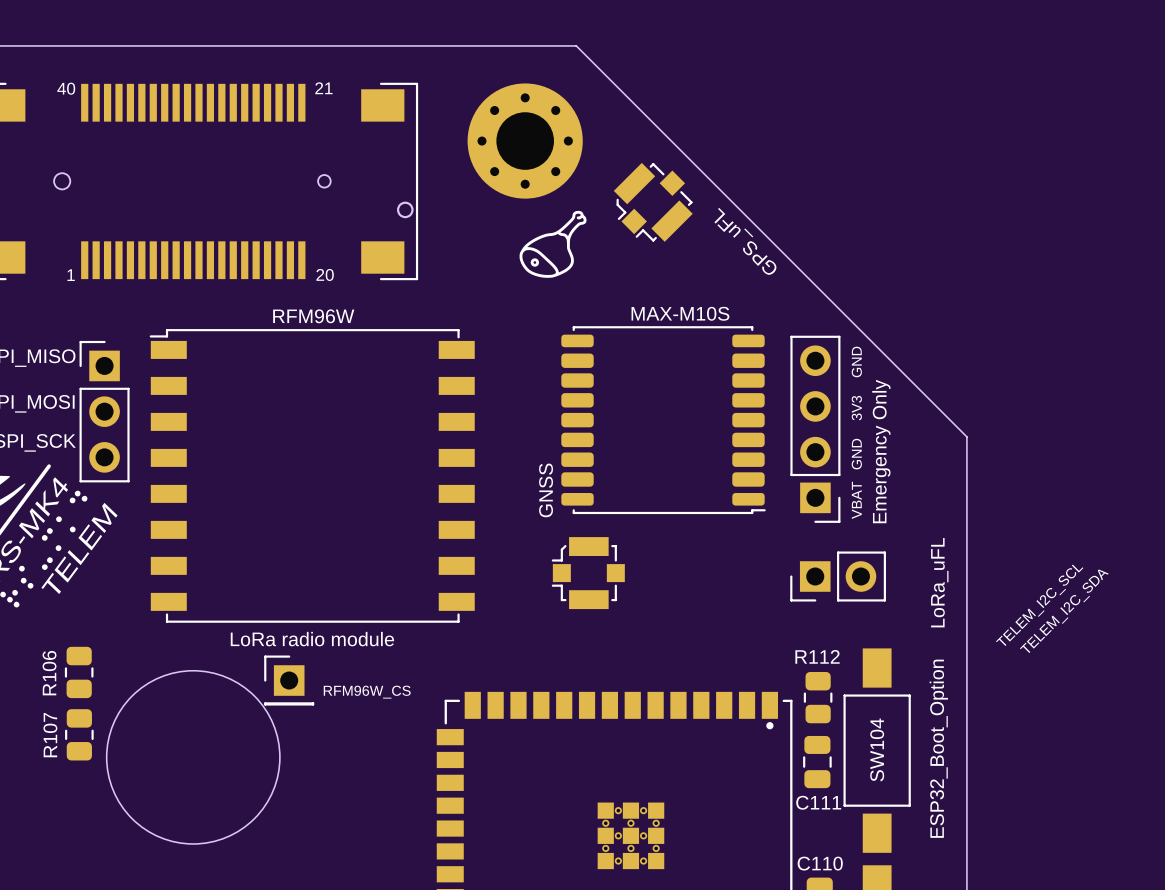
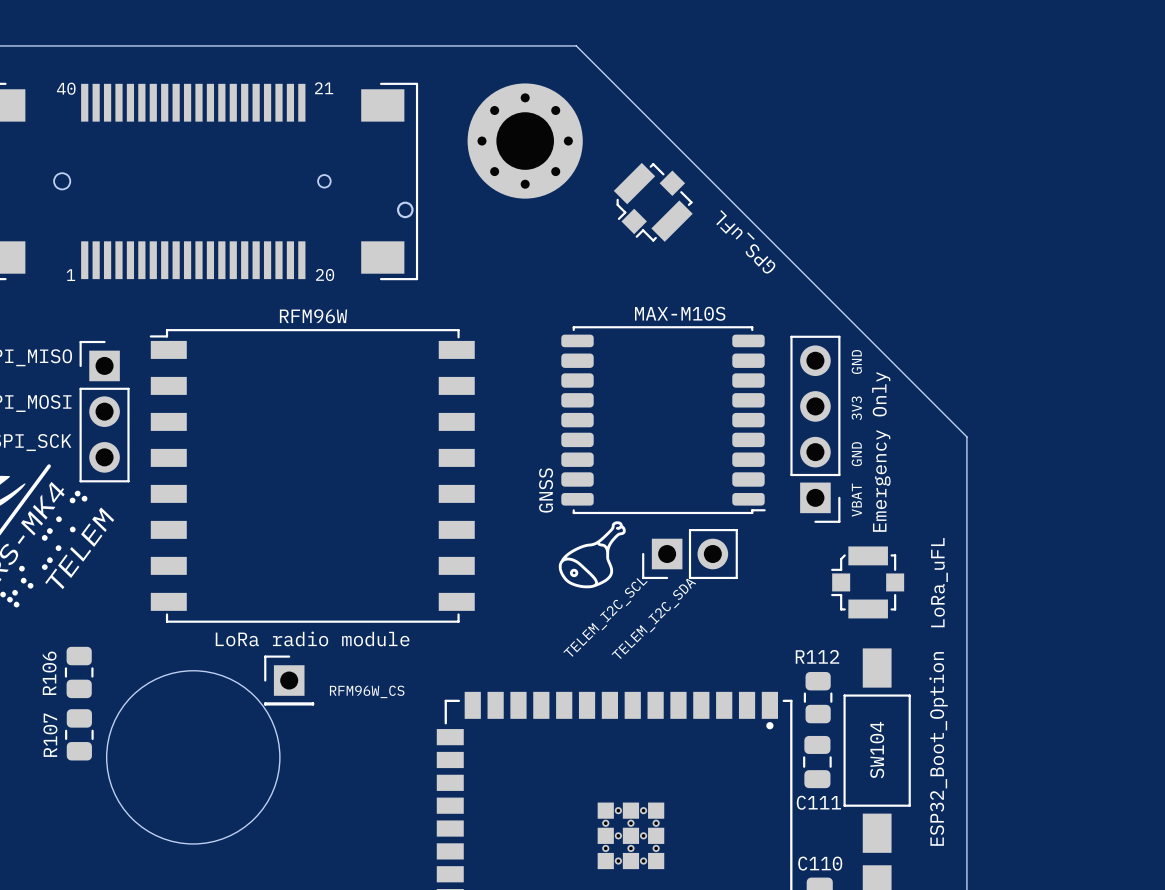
drawing position: (553, 244) -> (592, 554)
part position: (588, 573) -> (867, 582)
part position: (838, 576) -> (689, 554)
text position: TELEM_I2C_SCL (1039, 605) -> TELEM_I2C_SCL (605, 617)
text position: TELEM_I2C_SDA (1064, 611) -> TELEM_I2C_SDA (653, 618)

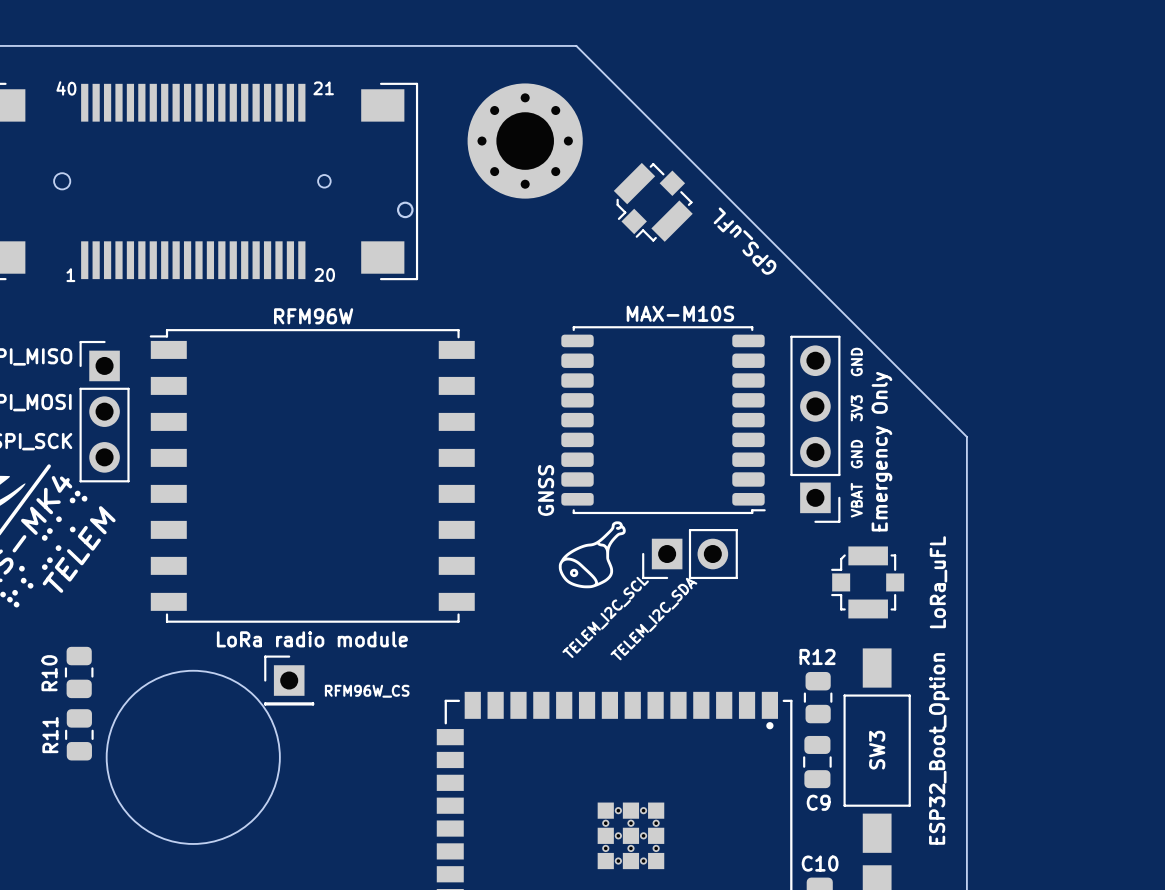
R112 name: R112 (817, 656) -> R12 (817, 656)
R106 name: R106 (49, 673) -> R10 (49, 673)
R107 name: R107 (50, 735) -> R11 (50, 735)
SW104 name: SW104 (877, 750) -> SW3 (877, 750)
C111 name: C111 (818, 802) -> C9 (818, 802)
C110 name: C110 (820, 863) -> C10 (820, 863)

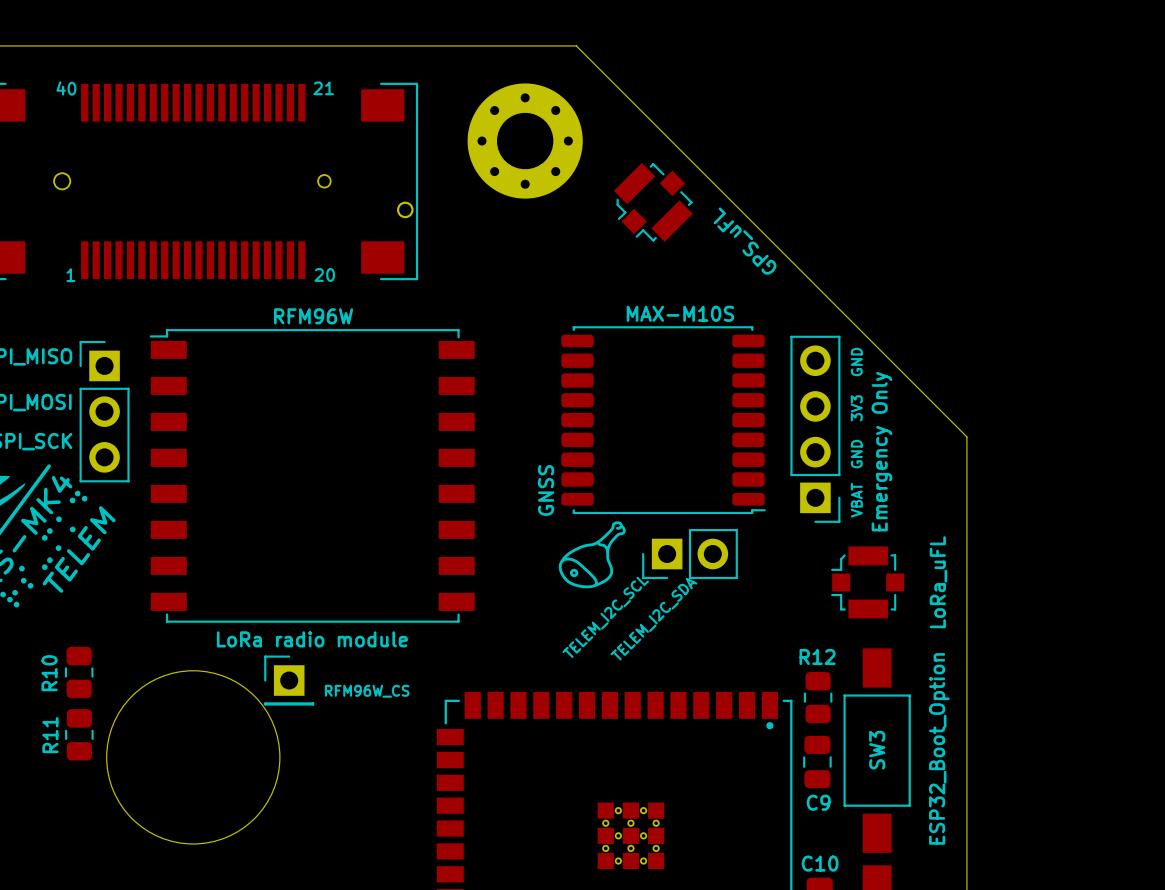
round board edge: none -> [496, 112, 555, 170]

